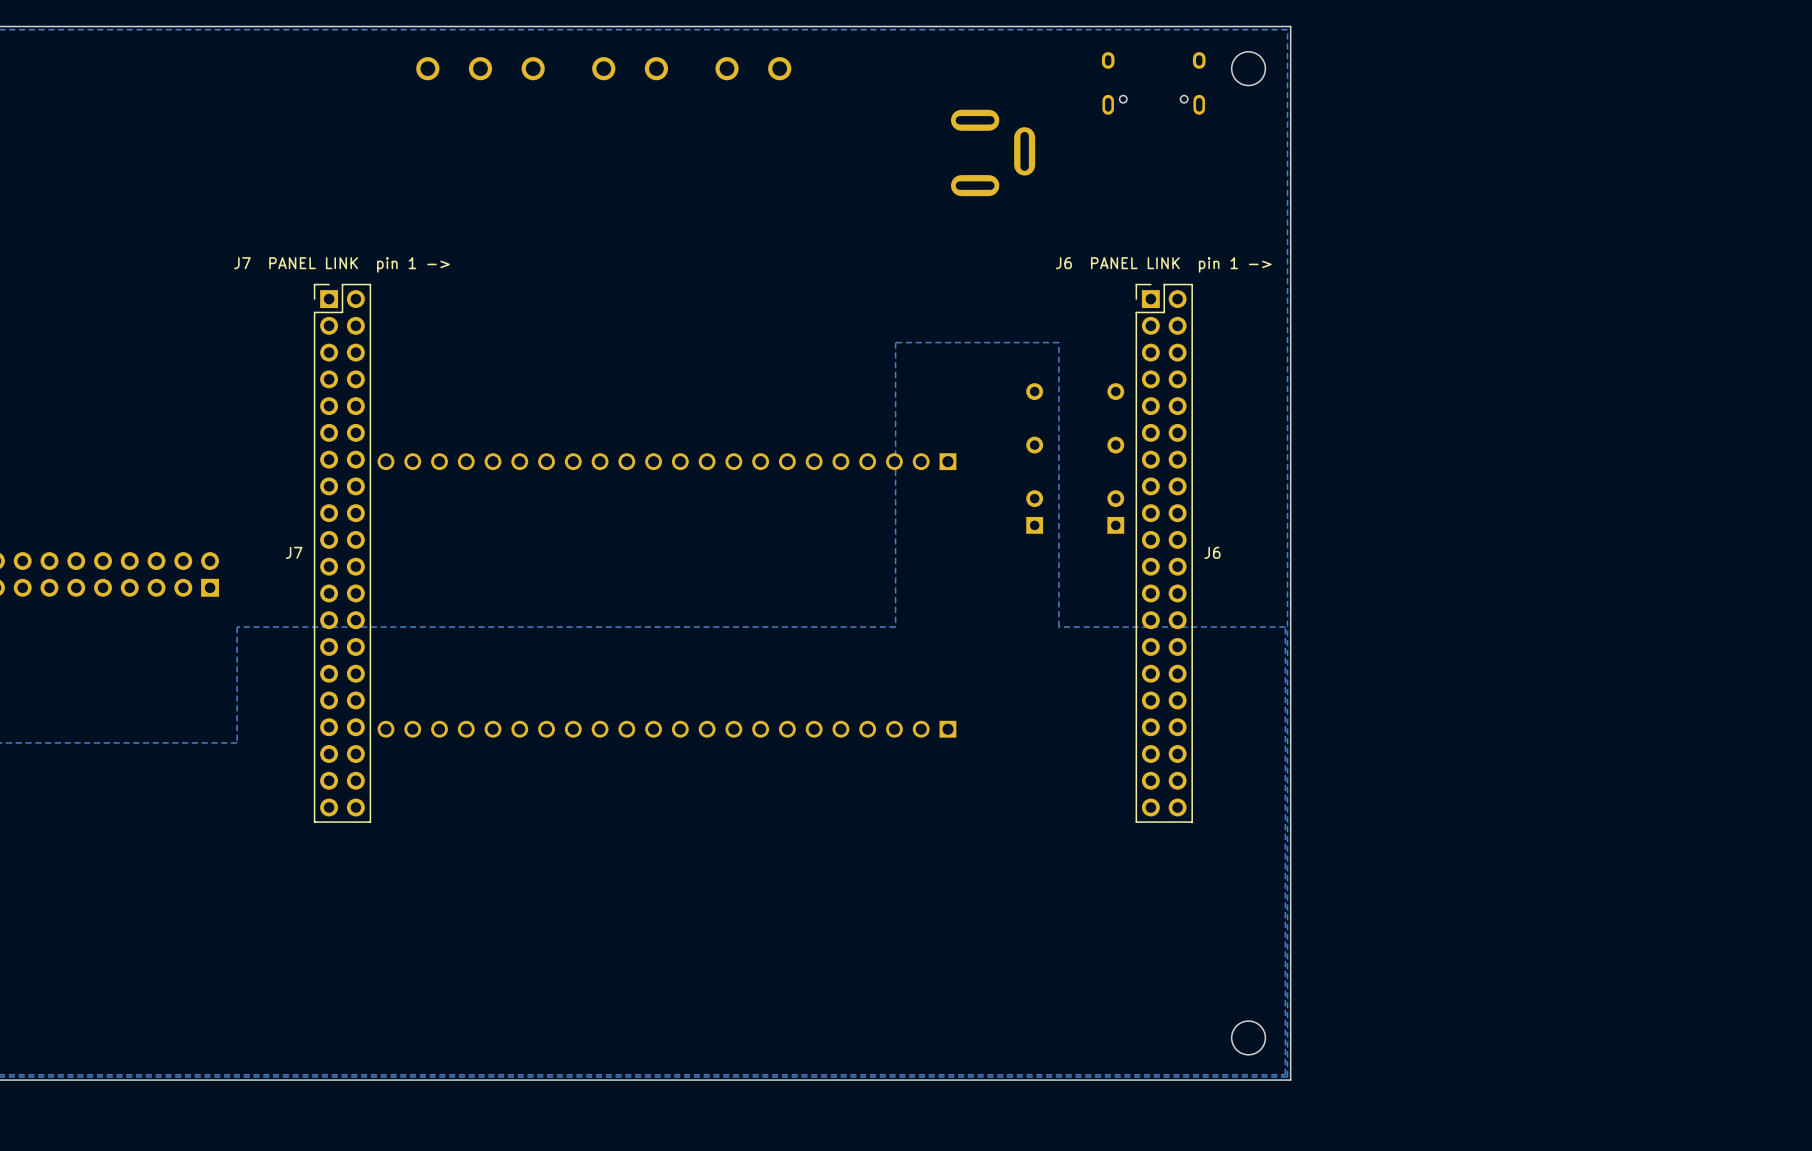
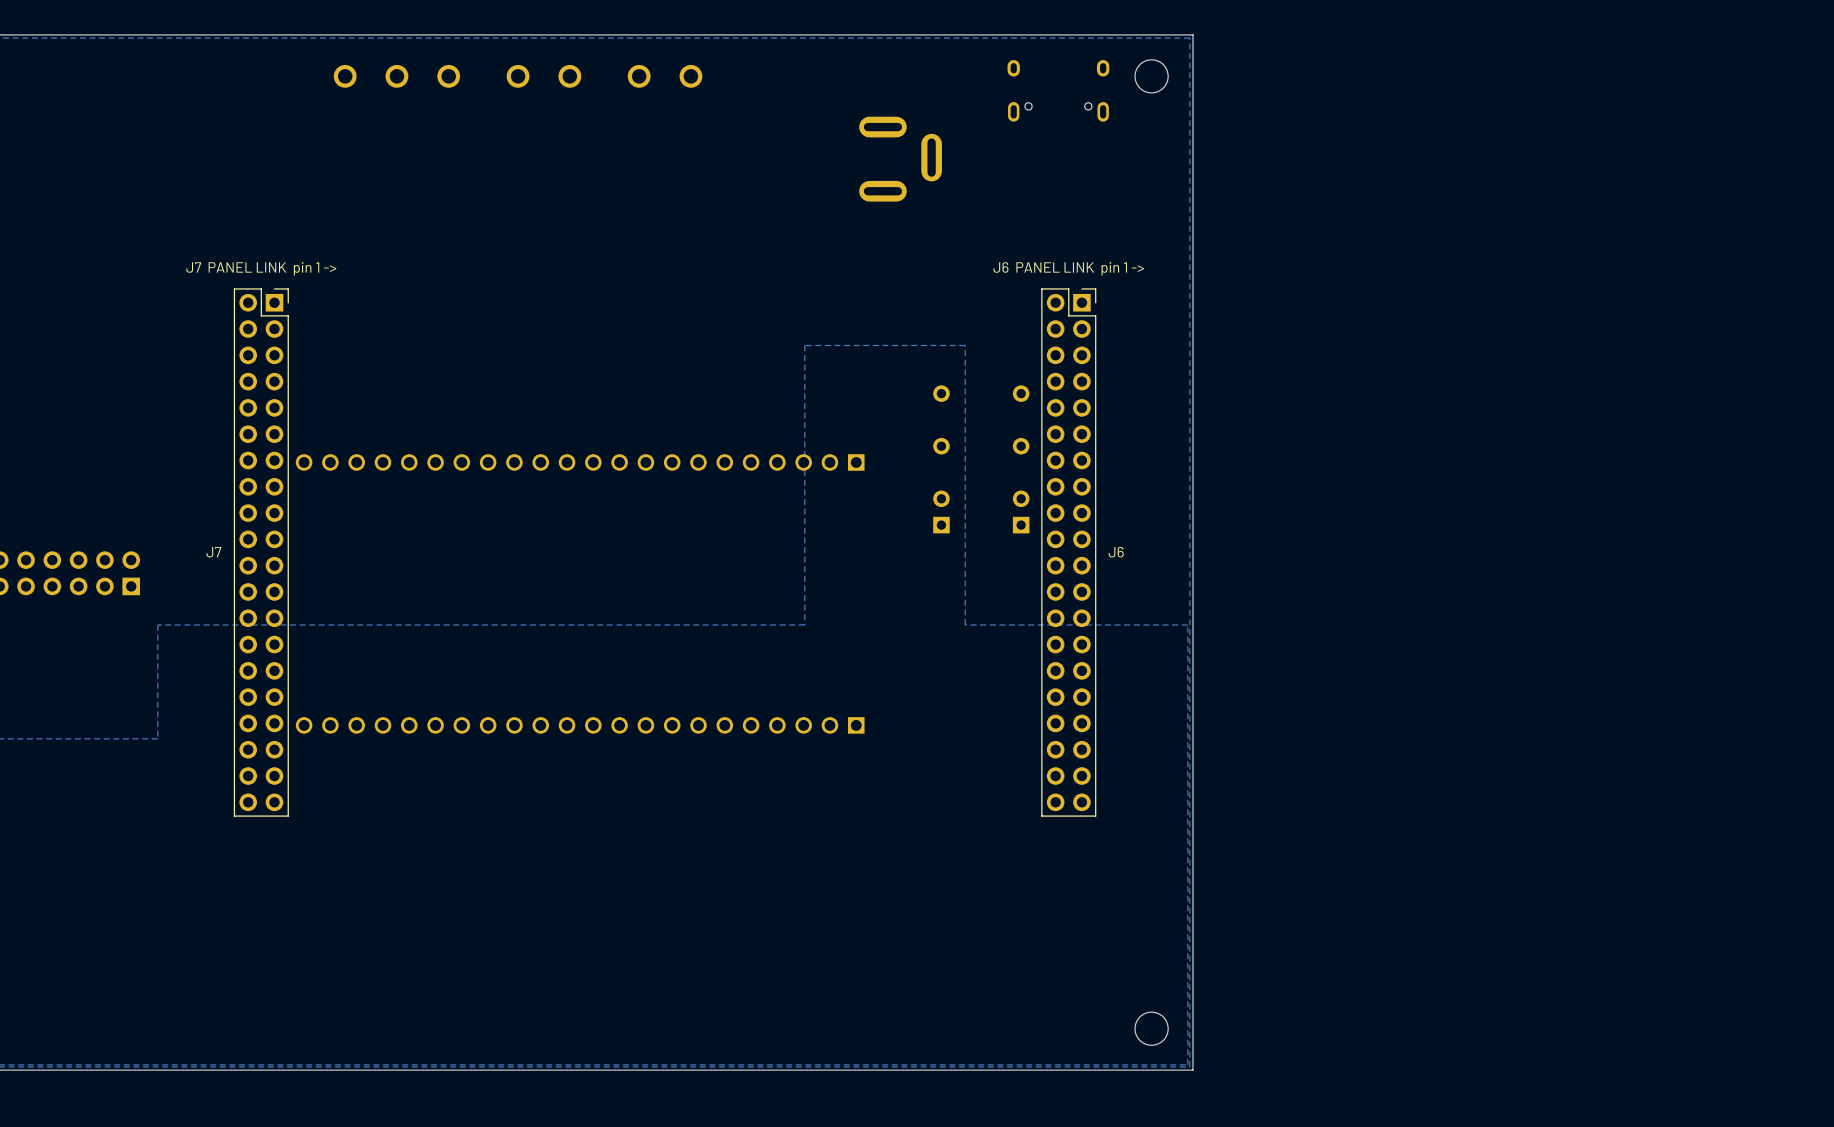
J7 footprint: [313, 283, 372, 823] -> [233, 288, 289, 817]
J6 footprint: [1135, 283, 1193, 823] -> [1041, 288, 1097, 817]

